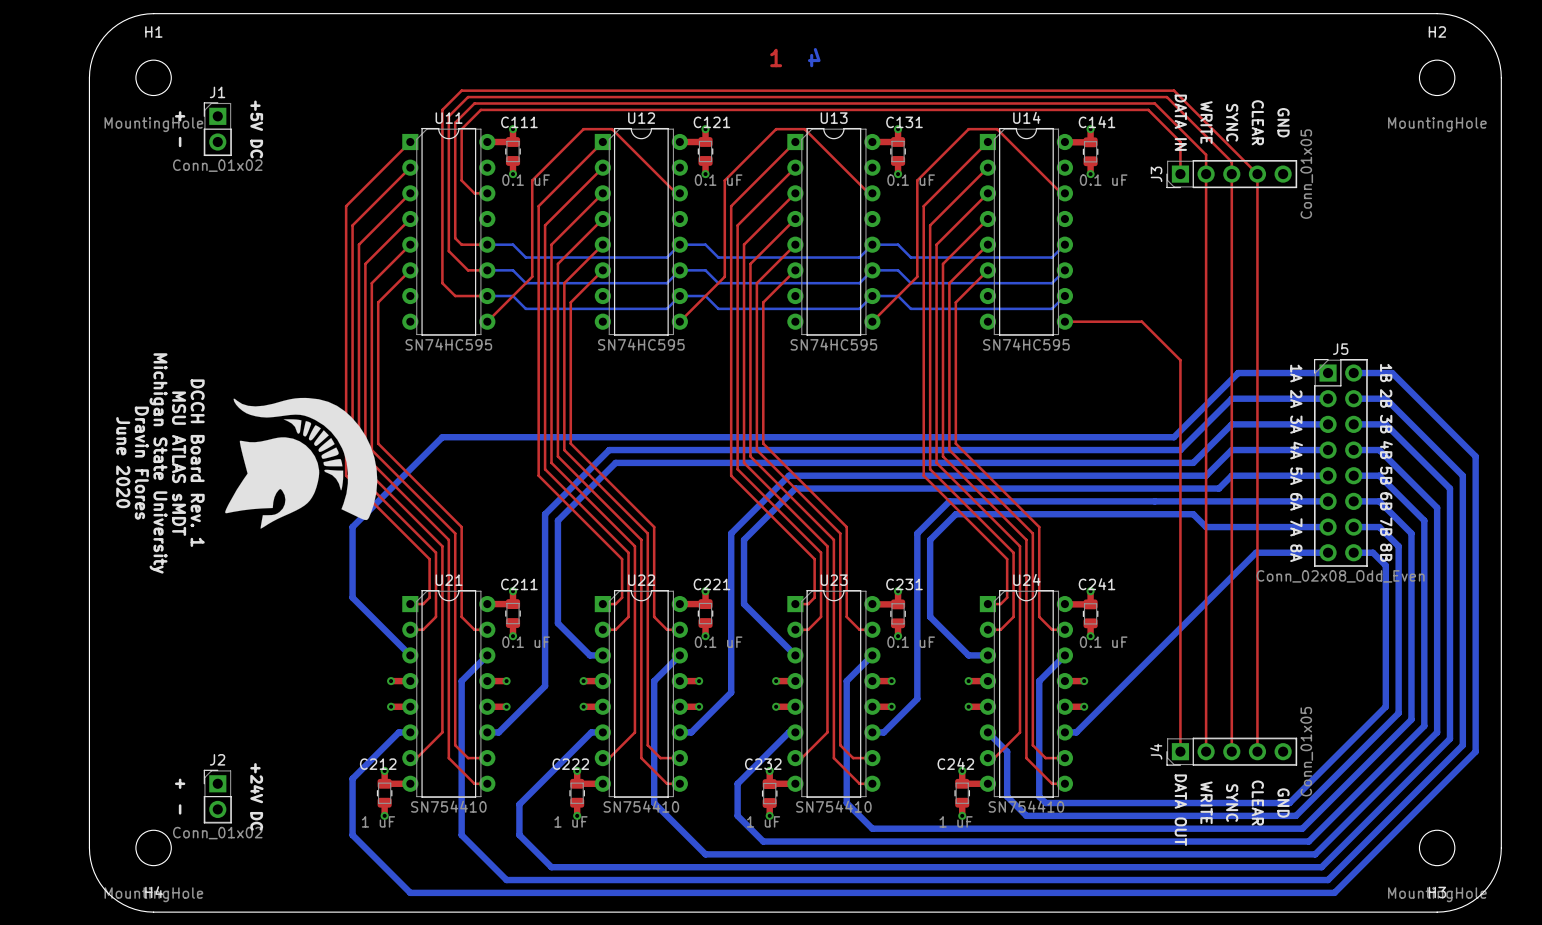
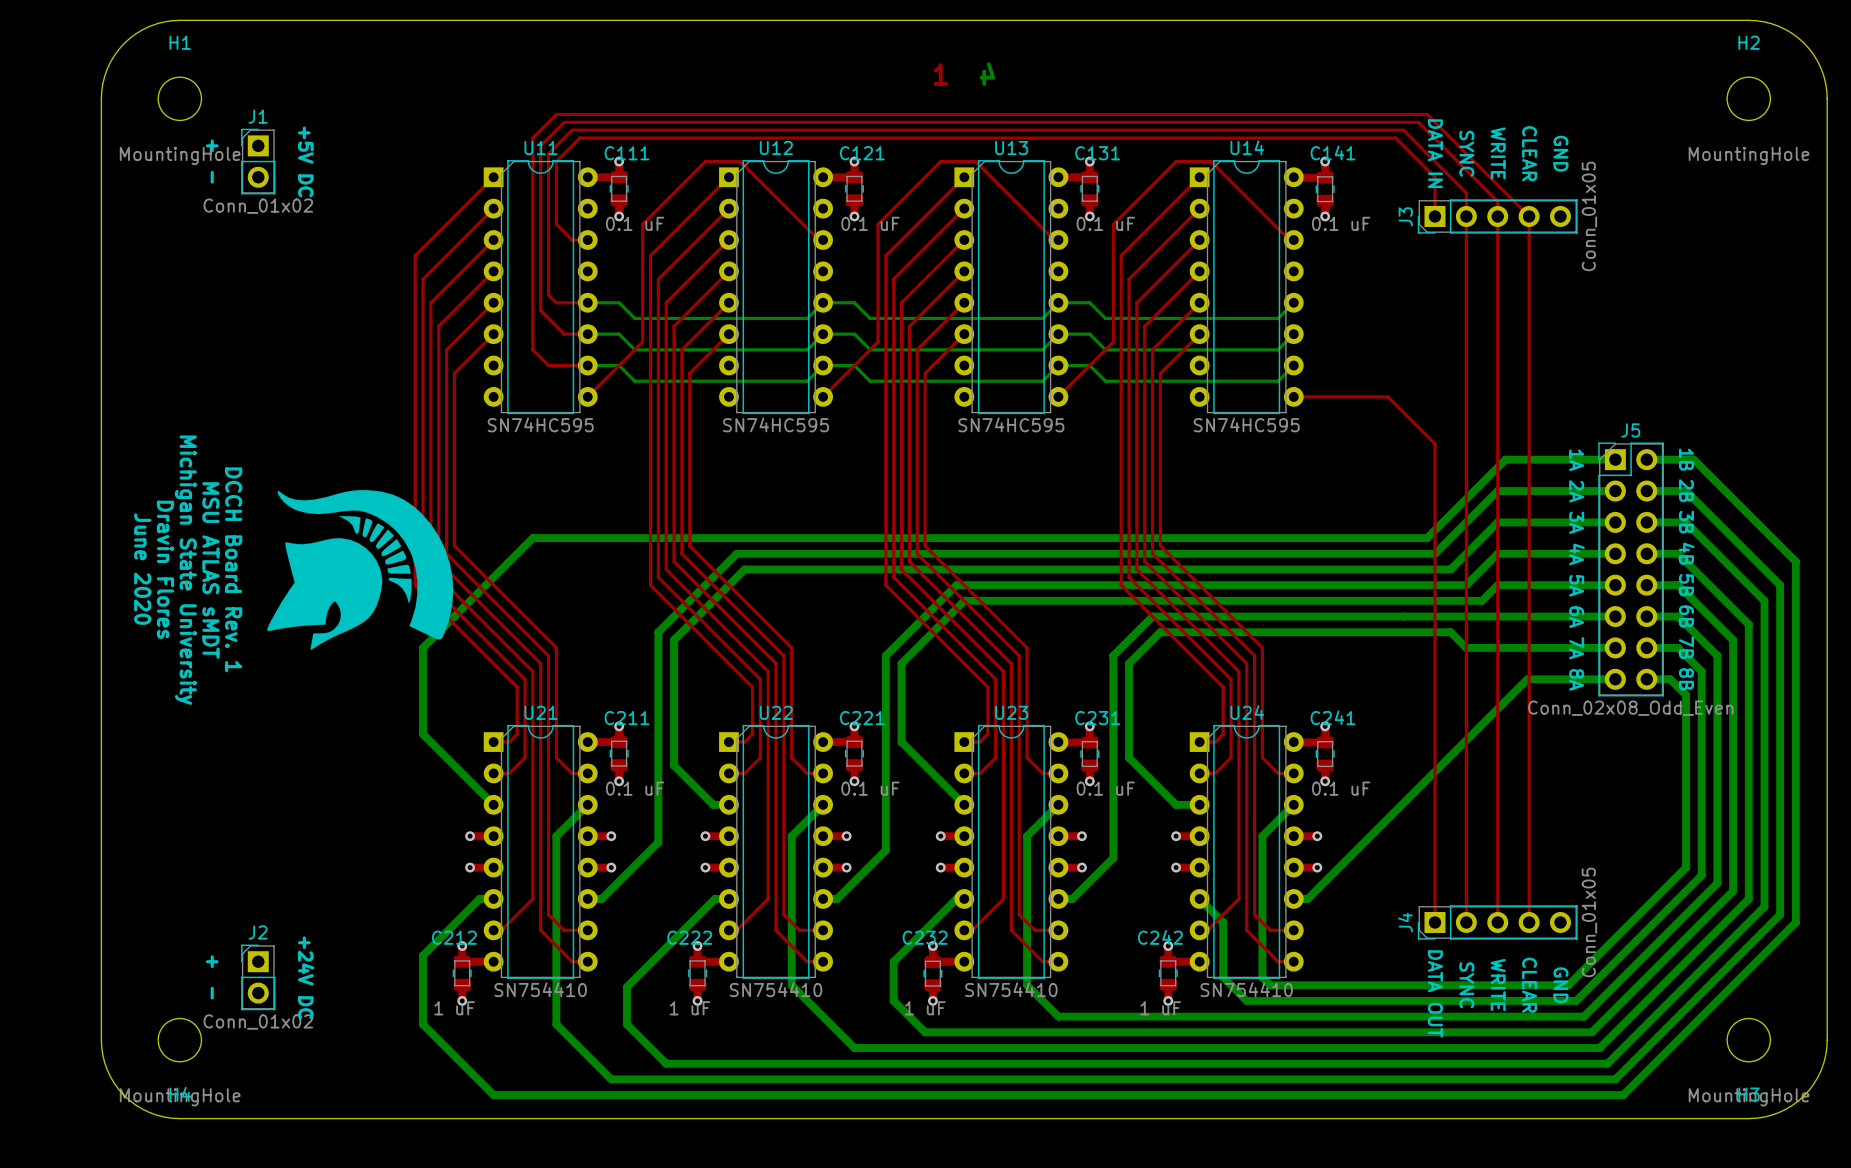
text: WRITE (1206, 122) -> SYNC (1466, 153)
text: SYNC (1232, 122) -> WRITE (1498, 153)
text: WRITE (1206, 802) -> SYNC (1466, 985)
text: SYNC (1232, 803) -> WRITE (1498, 984)

